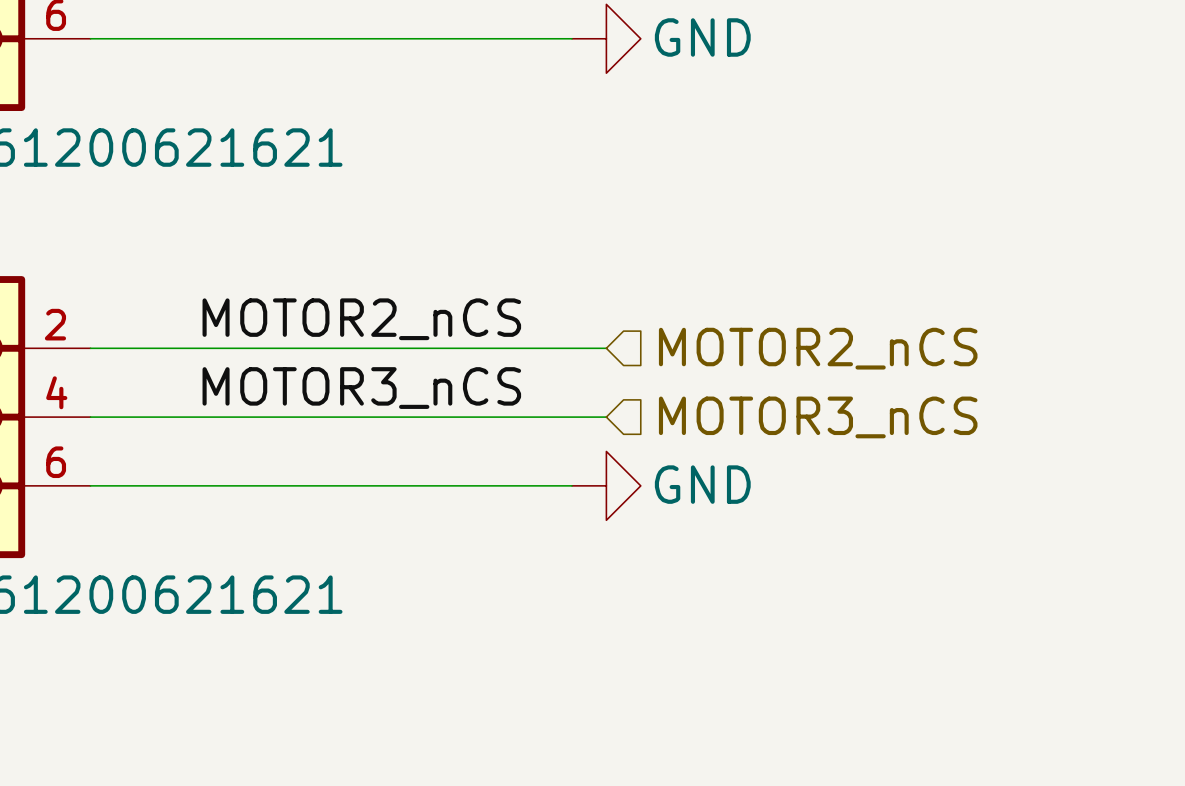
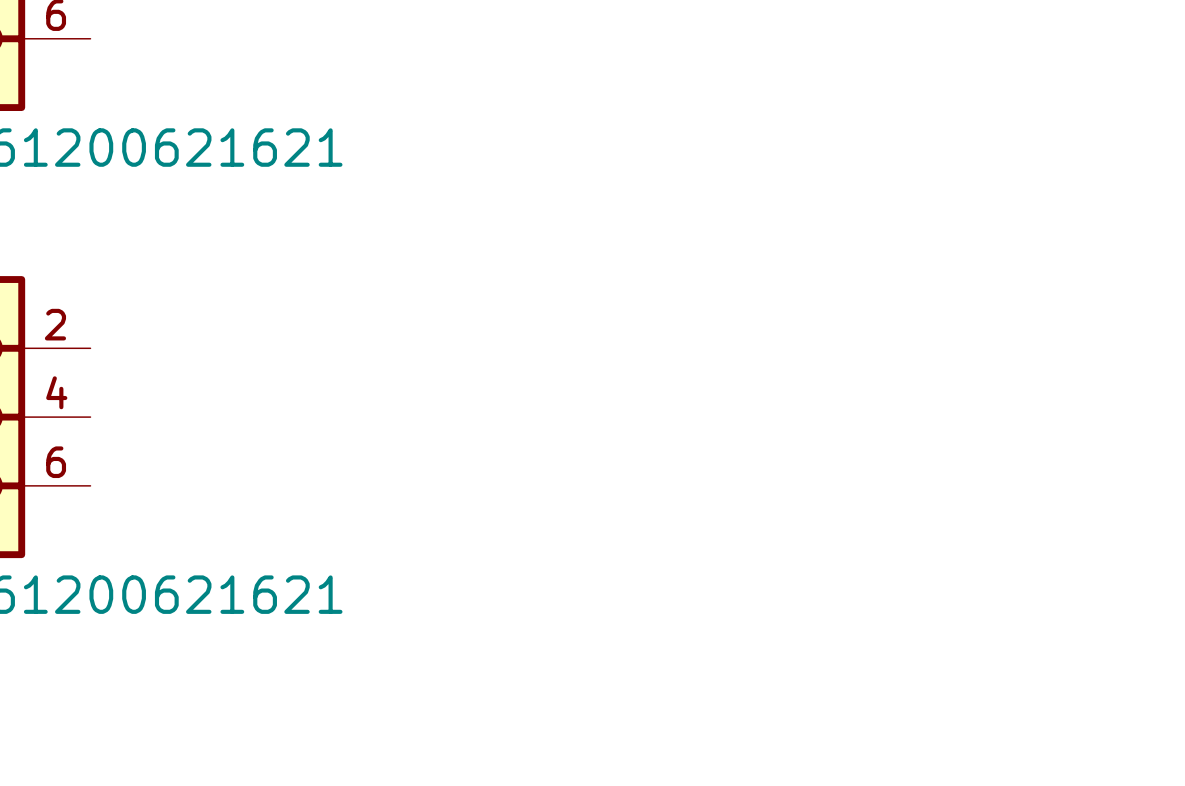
wire: (90, 38) (571, 38) -> none
power symbol: GND (606, 38) -> none
label: MOTOR2_nCS (361, 319) -> none
wire: (90, 348) (606, 348) -> none
hierarchical label: MOTOR2_nCS (818, 348) -> none
label: MOTOR3_nCS (361, 388) -> none
wire: (90, 417) (606, 417) -> none
hierarchical label: MOTOR3_nCS (818, 417) -> none
wire: (90, 485) (571, 485) -> none
power symbol: GND (606, 485) -> none

